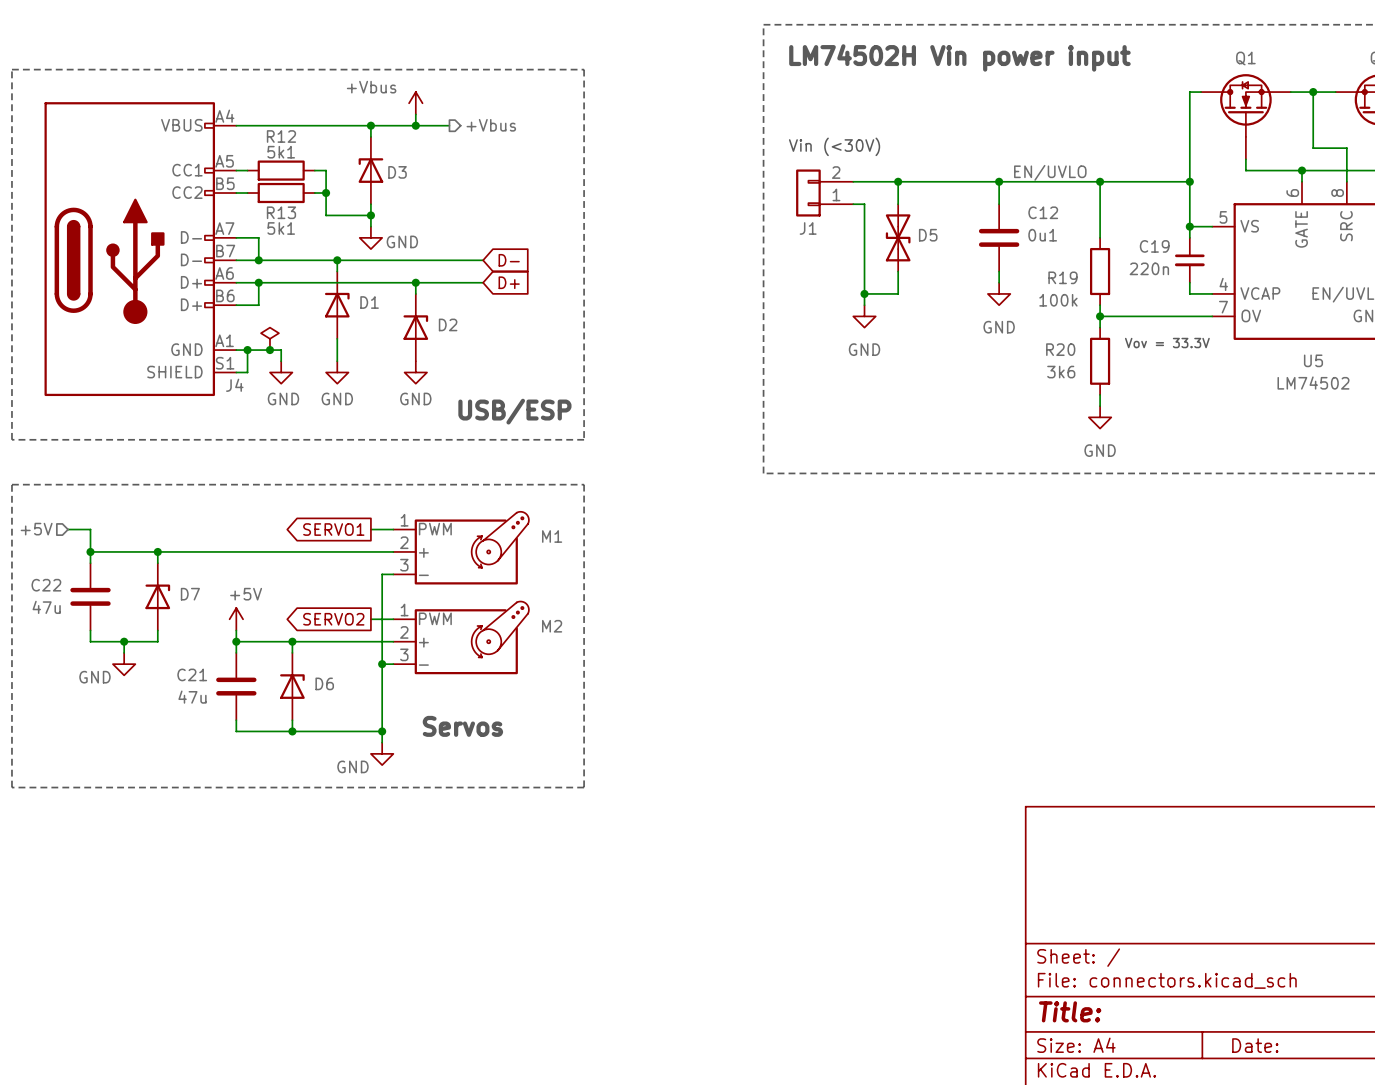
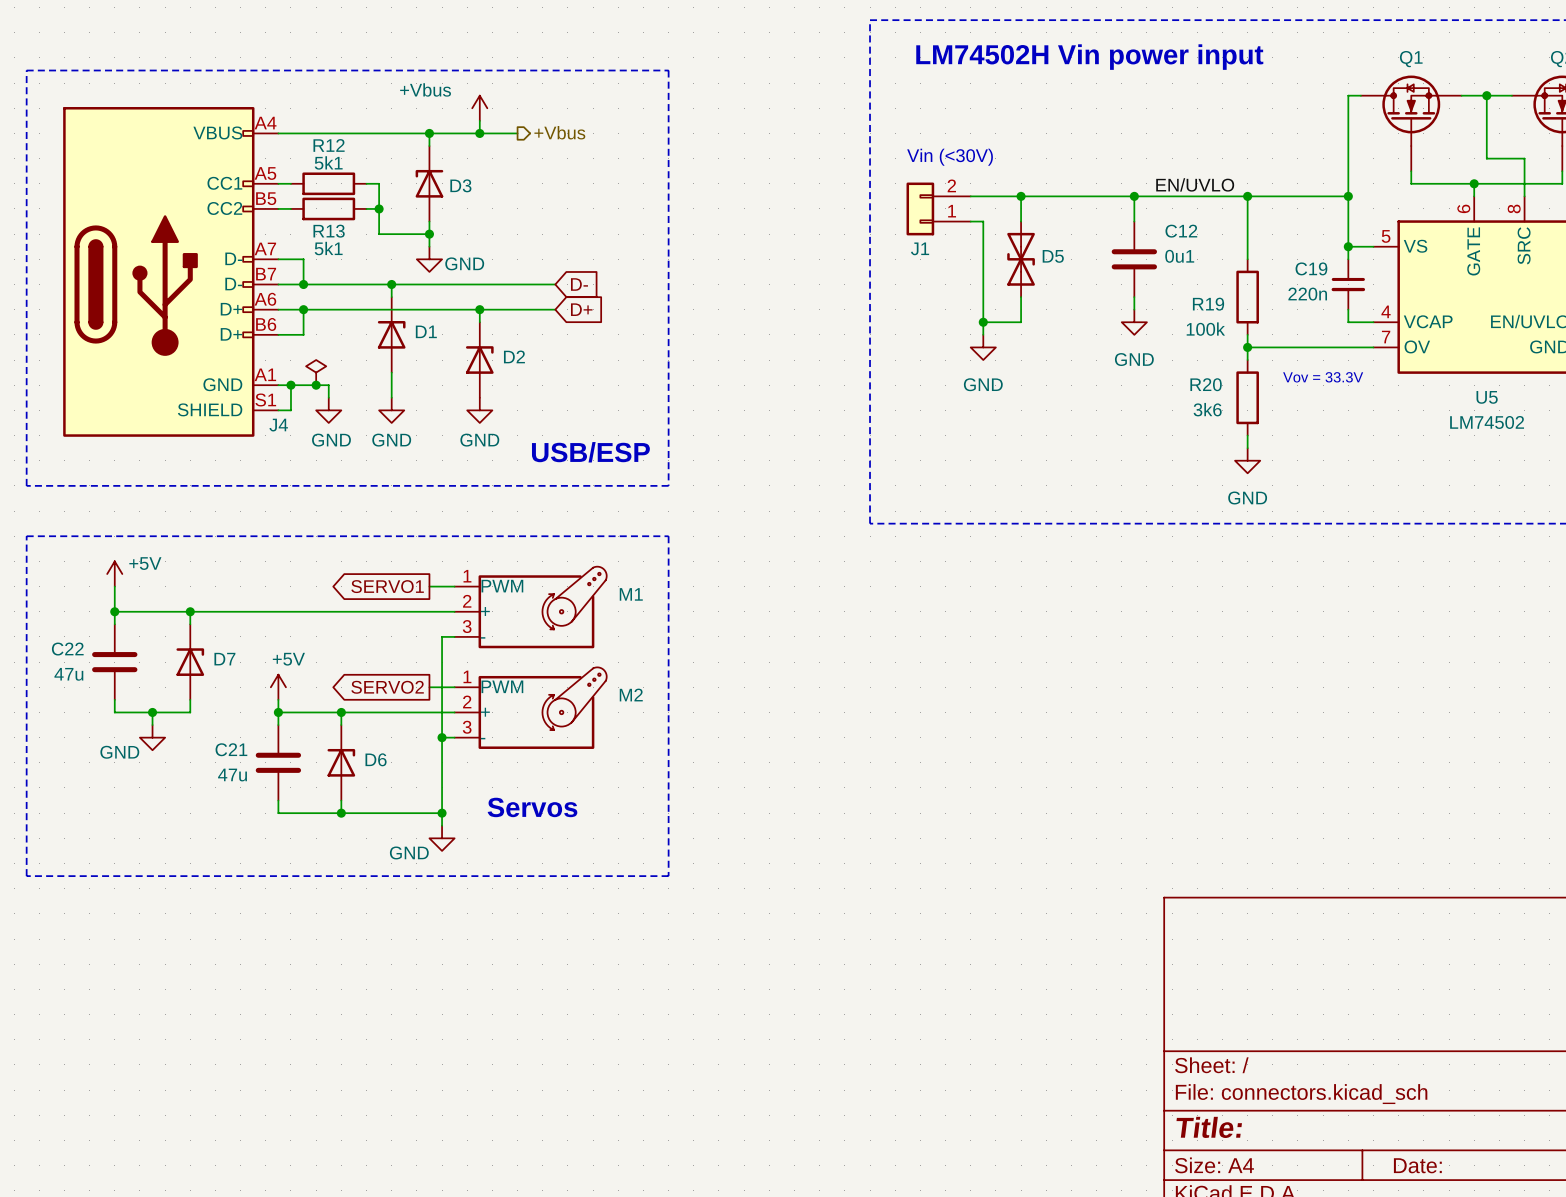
power symbol: none -> +5V (114, 574)
hierarchical label: +5V (36, 529) -> none
wire: (68, 529) (90, 529) -> none

